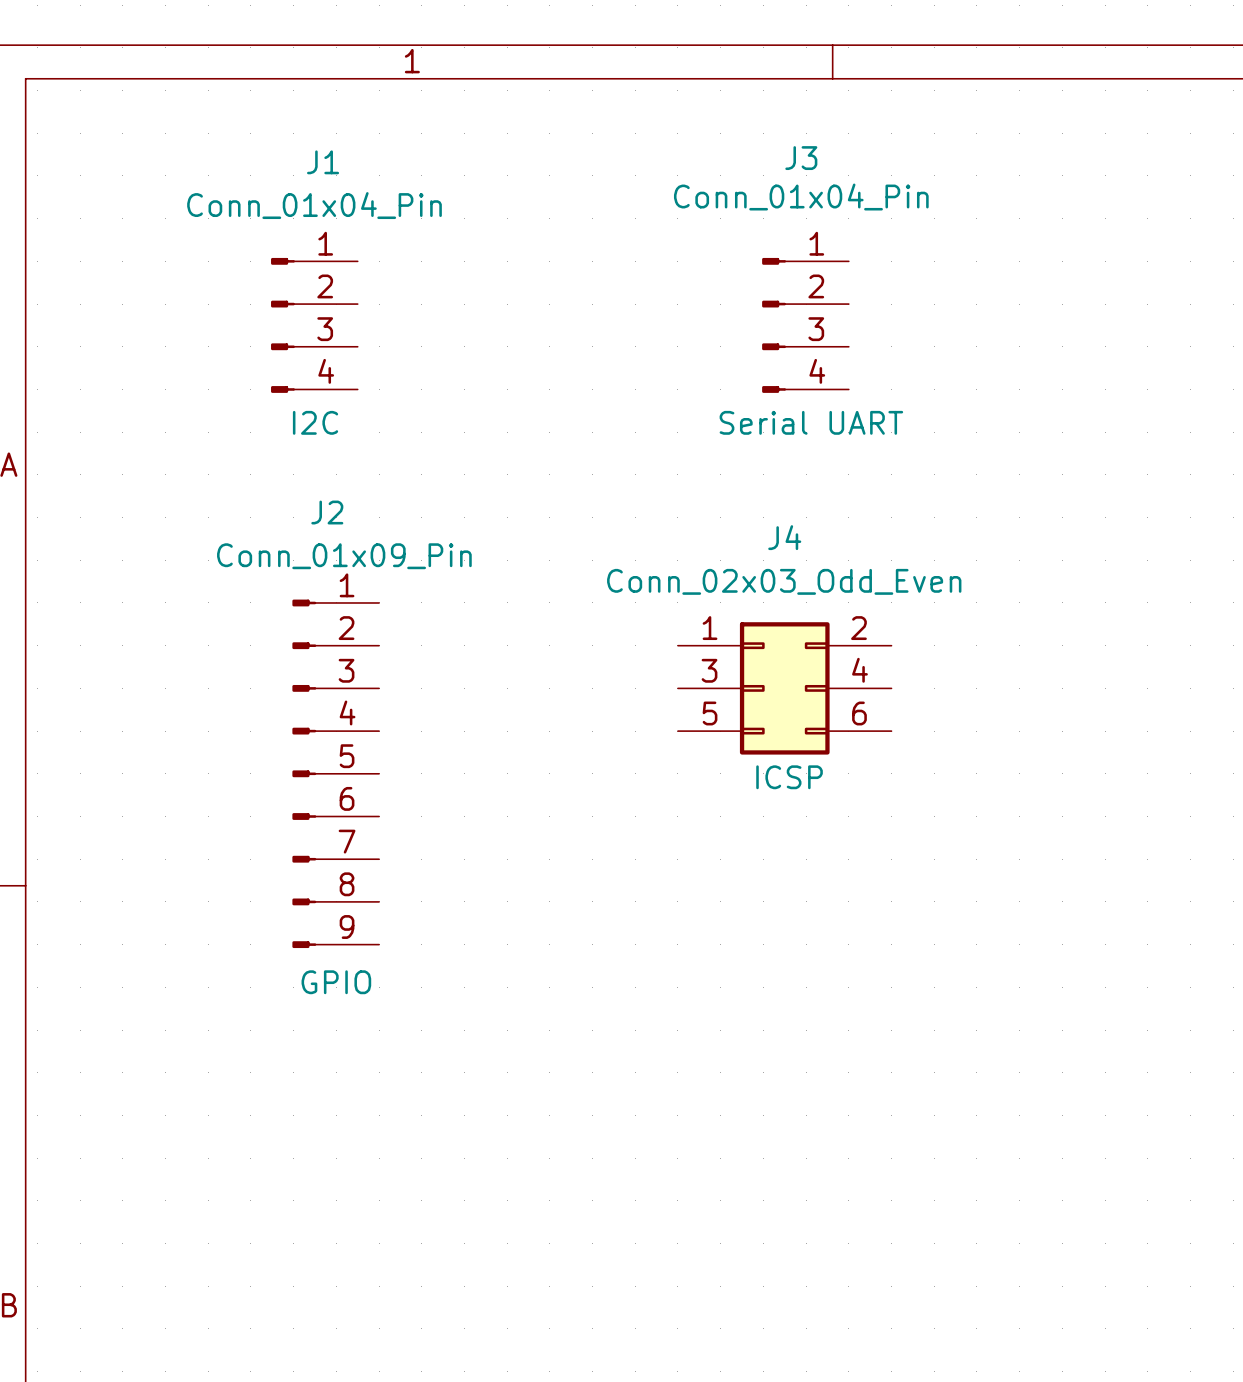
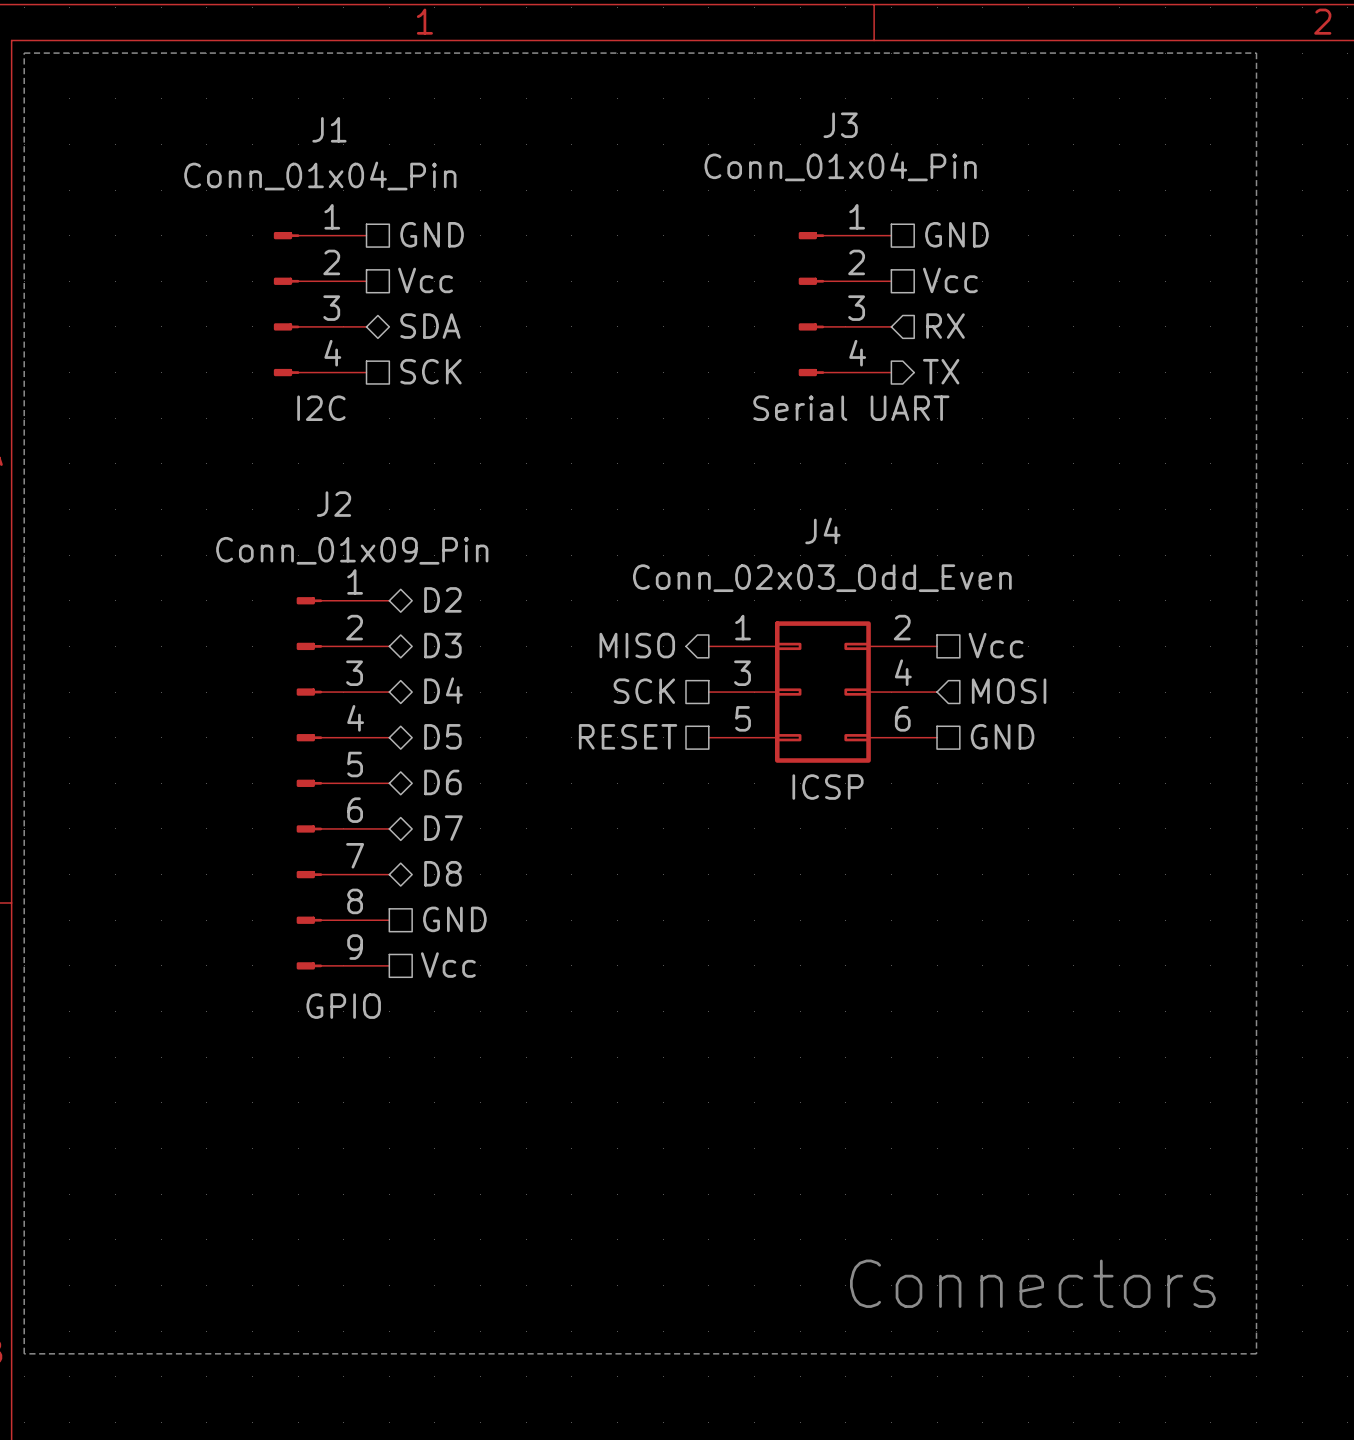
line: none -> (24, 53) (1256, 53) (1256, 1353) (24, 1353) (24, 53)
hierarchical label: none -> GND (432, 234)
hierarchical label: none -> GND (956, 234)
hierarchical label: none -> Vcc (425, 280)
hierarchical label: none -> Vcc (950, 280)
hierarchical label: none -> SDA (430, 326)
hierarchical label: none -> RX (945, 326)
hierarchical label: none -> SCK (430, 371)
hierarchical label: none -> TX (941, 371)
hierarchical label: none -> D2 (442, 599)
hierarchical label: none -> D3 (442, 645)
hierarchical label: none -> MISO (637, 645)
hierarchical label: none -> Vcc (996, 645)
hierarchical label: none -> D4 (443, 690)
hierarchical label: none -> SCK (644, 691)
hierarchical label: none -> MOSI (1009, 691)
hierarchical label: none -> D5 (442, 736)
hierarchical label: none -> RESET (628, 736)
hierarchical label: none -> GND (1002, 736)
hierarchical label: none -> D6 (442, 782)
hierarchical label: none -> D7 (443, 828)
hierarchical label: none -> D8 (442, 873)
hierarchical label: none -> GND (454, 919)
hierarchical label: none -> Vcc (448, 965)
text: none -> Connectors (1032, 1283)

